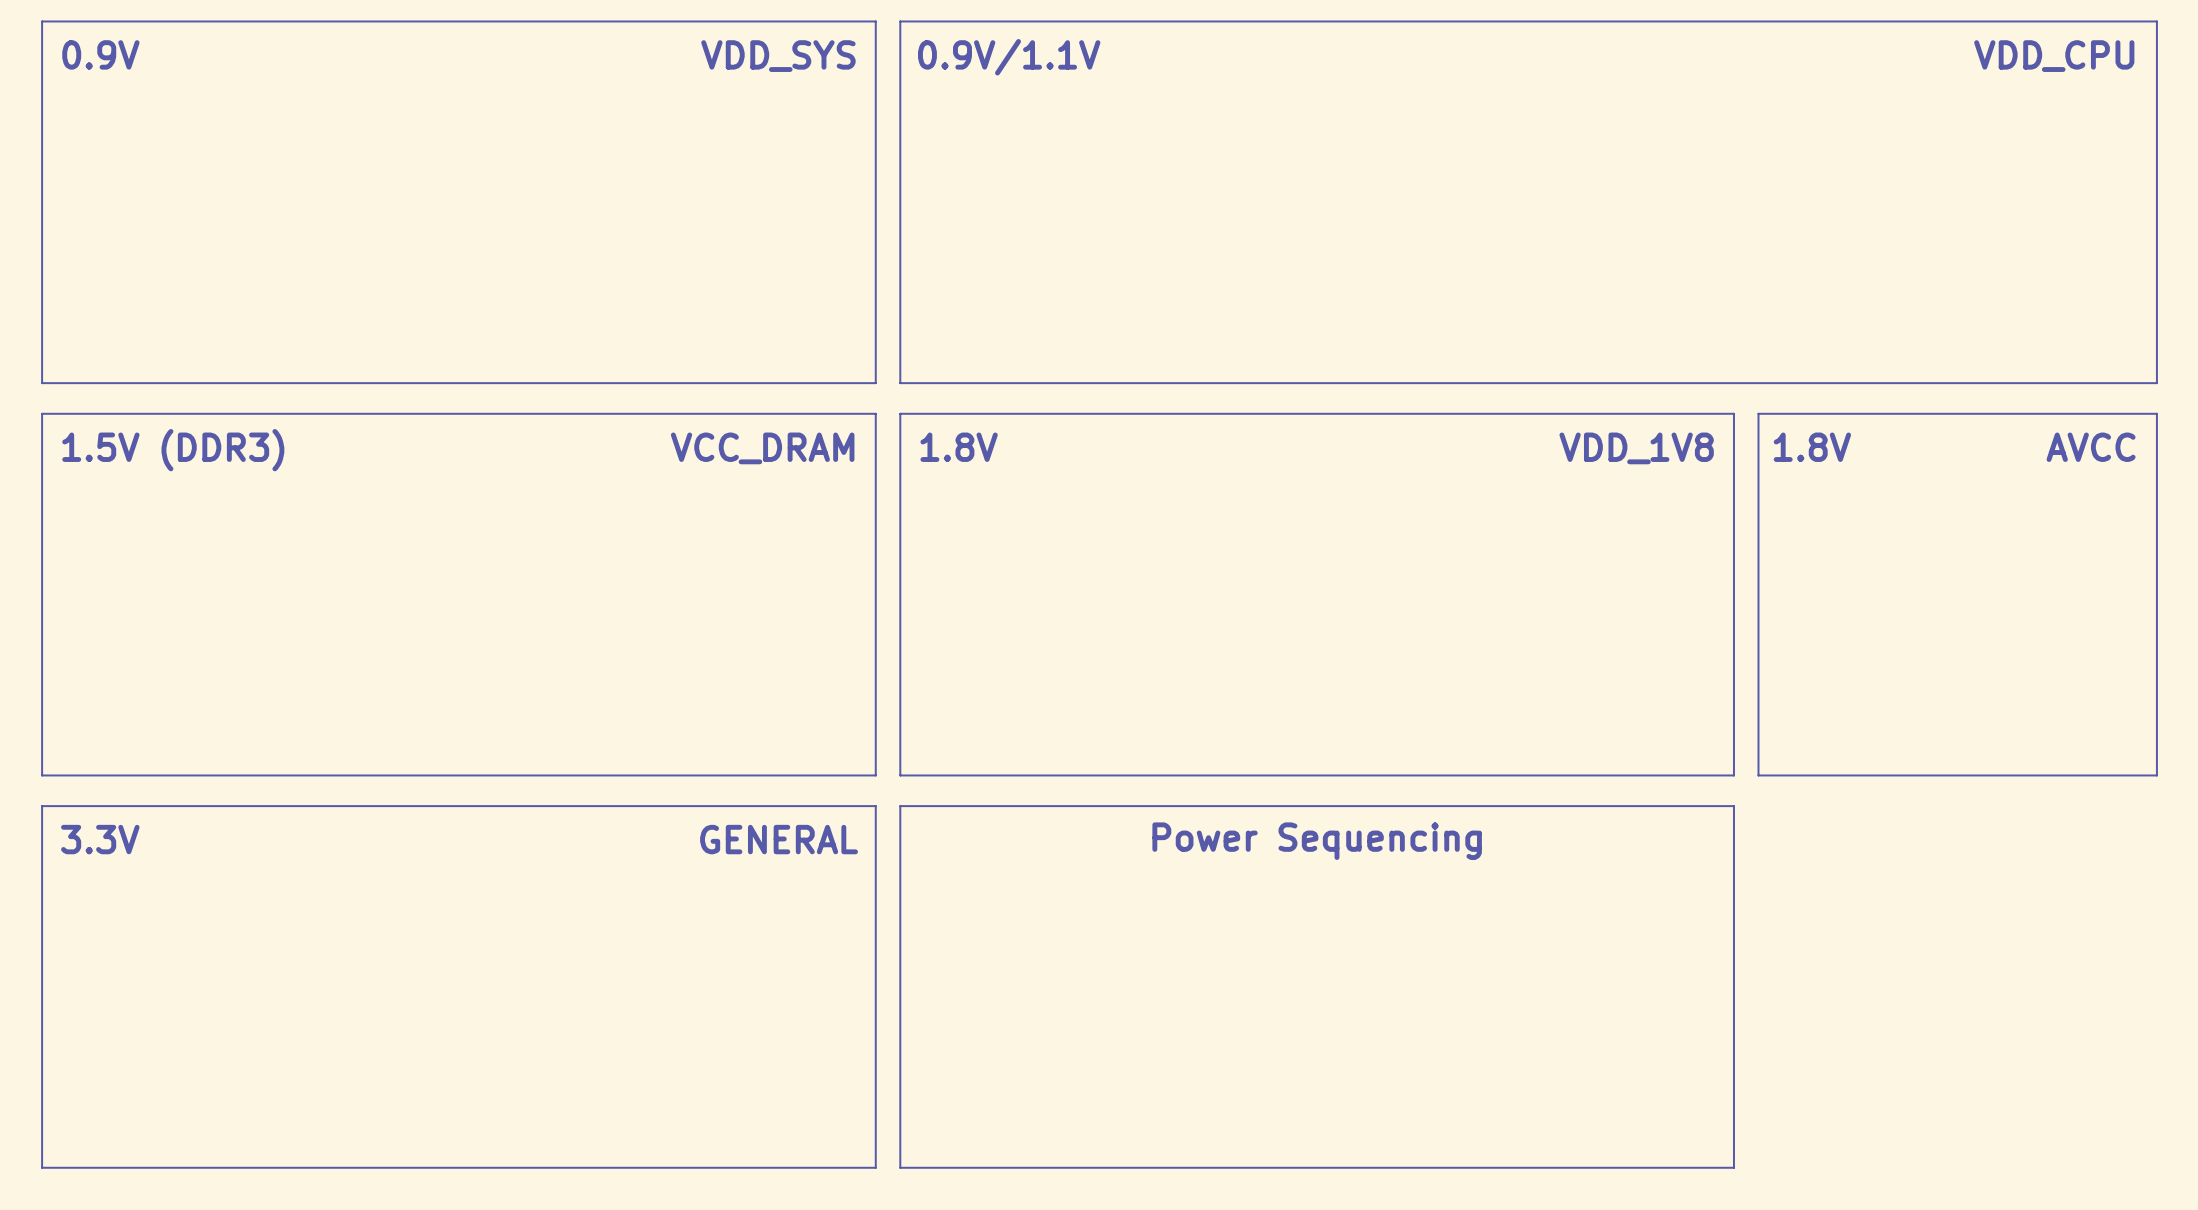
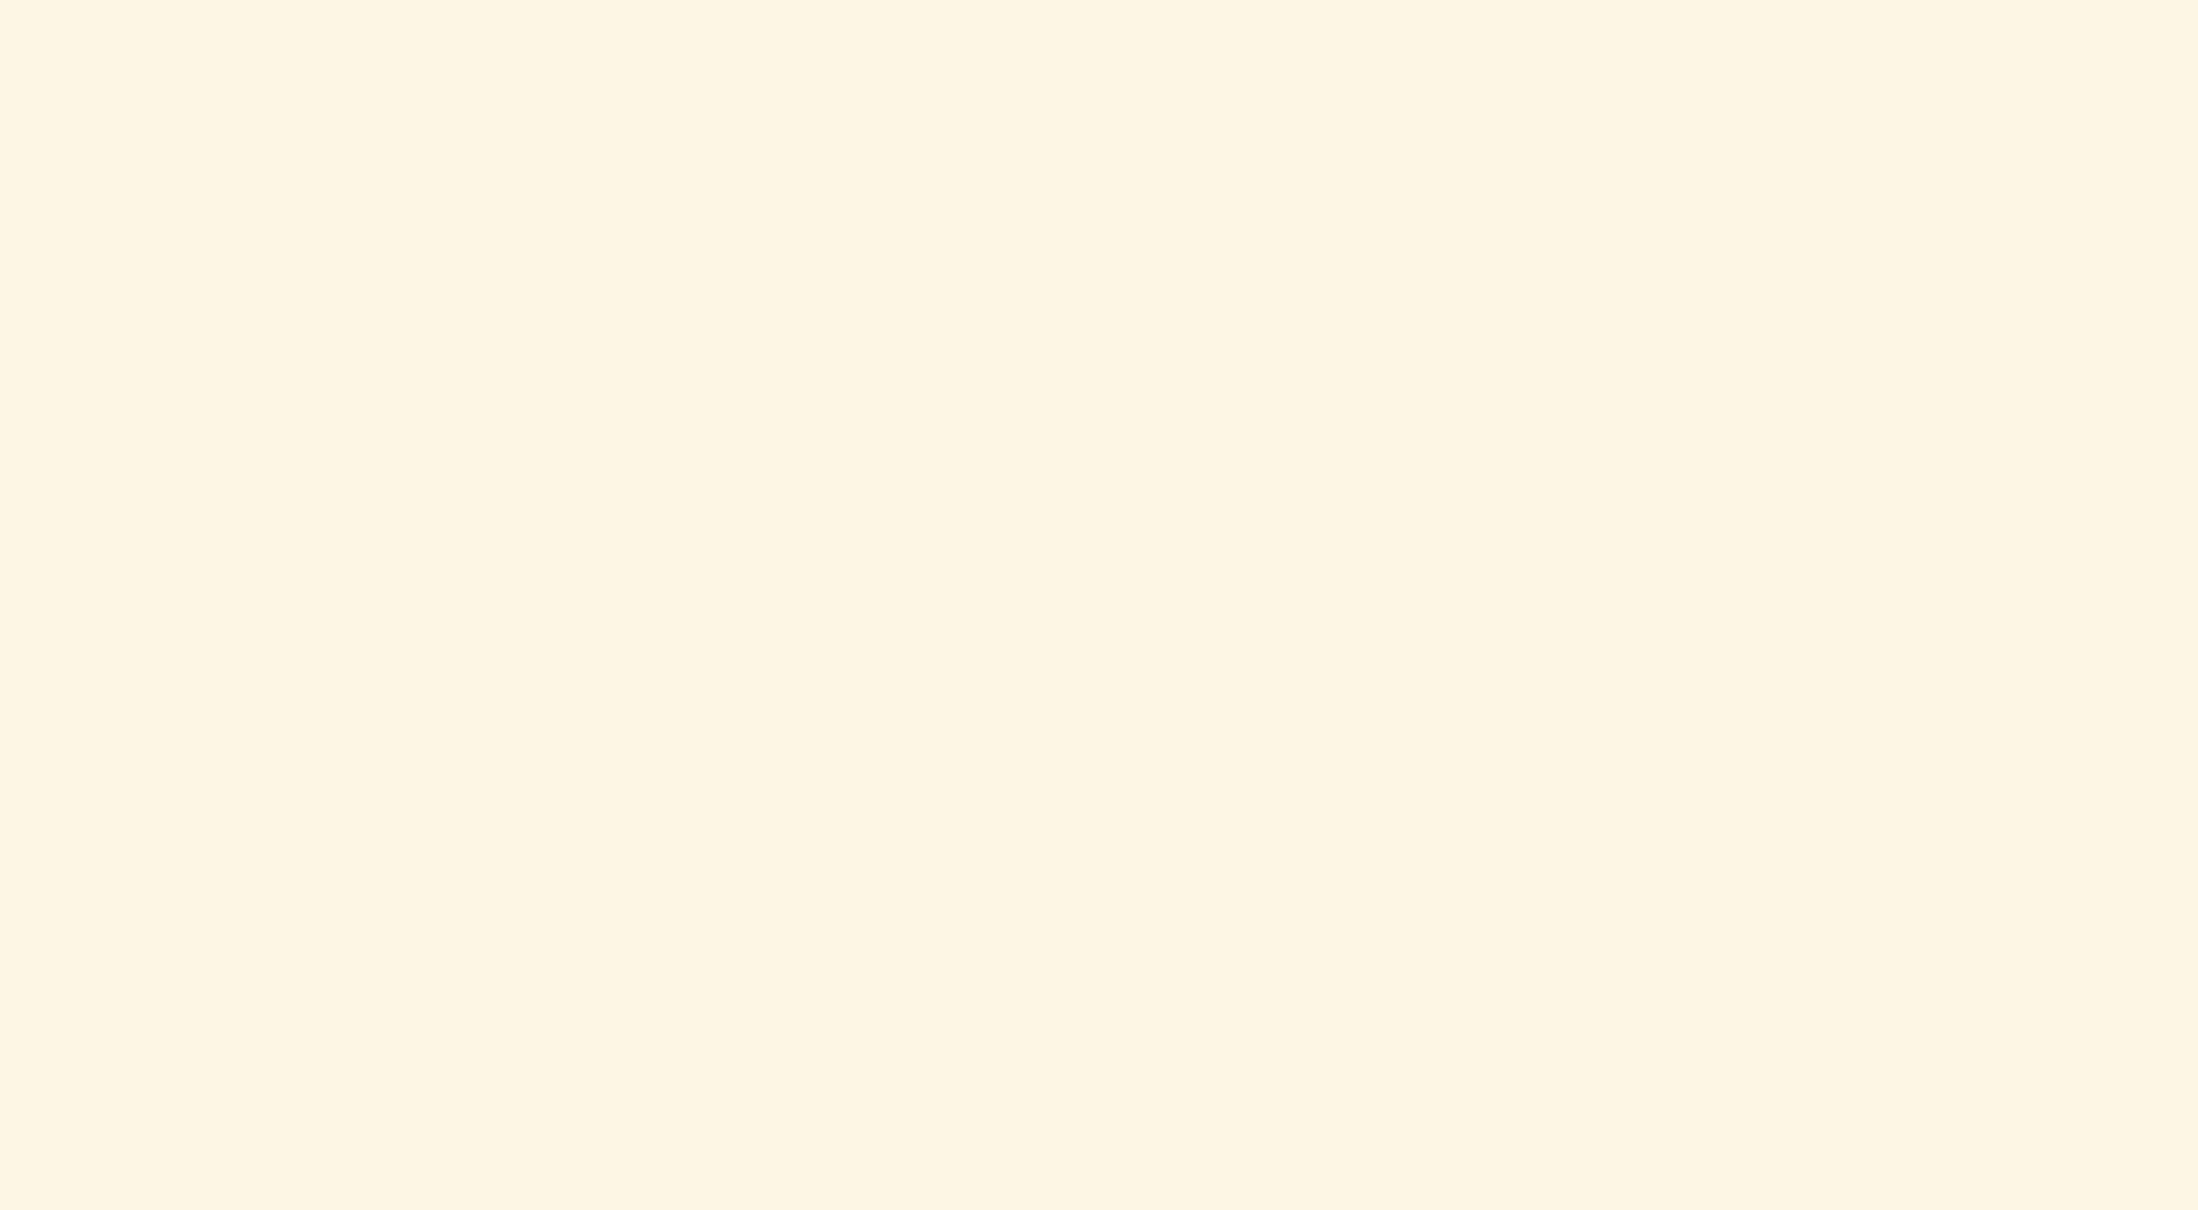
line: (42, 21) (875, 21) (875, 383) (42, 383) (42, 21) -> none
line: (900, 21) (2156, 21) (2156, 383) (900, 383) (900, 21) -> none
text: 0.9V (100, 54) -> none
text: VDD_SYS (778, 56) -> none
text: VDD_CPU (2054, 56) -> none
text: 0.9V/1.1V (1009, 57) -> none
line: (42, 413) (42, 775) (875, 775) (875, 413) (42, 413) -> none
line: (900, 413) (1733, 413) (1733, 775) (900, 775) (900, 413) -> none
line: (1758, 413) (2156, 413) (2156, 775) (1758, 775) (1758, 413) -> none
text: 1.8V (959, 447) -> none
text: 1.8V (1812, 447) -> none
text: AVCC (2091, 447) -> none
text: VCC_DRAM (762, 448) -> none
text: VDD_1V8 (1636, 448) -> none
text: 1.5V (DDR3) (173, 450) -> none
line: (42, 806) (875, 806) (875, 1167) (42, 1167) (42, 806) -> none
line: (900, 806) (900, 1167) (1733, 1167) (1733, 806) (900, 806) -> none
text: 3.3V (100, 839) -> none
text: GENERAL (779, 839) -> none
text: Power Sequencing (1317, 841) -> none

